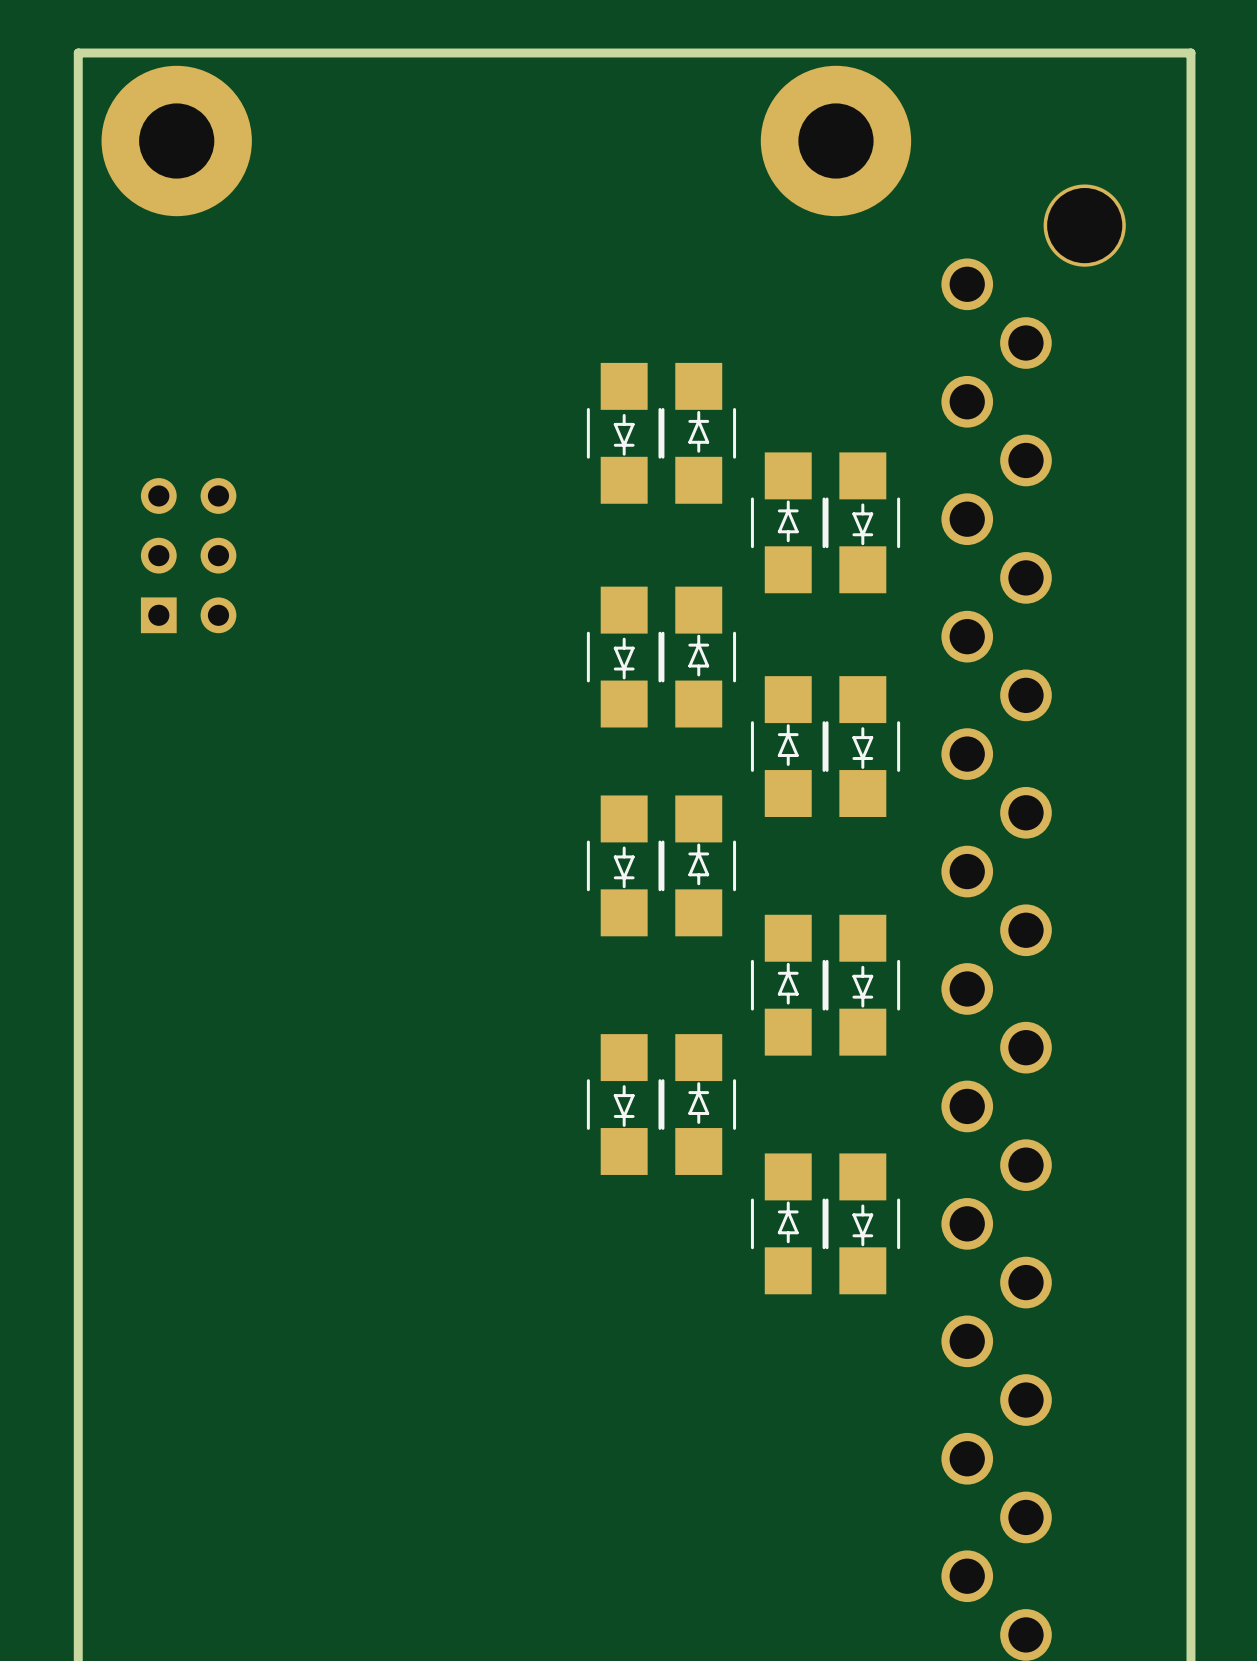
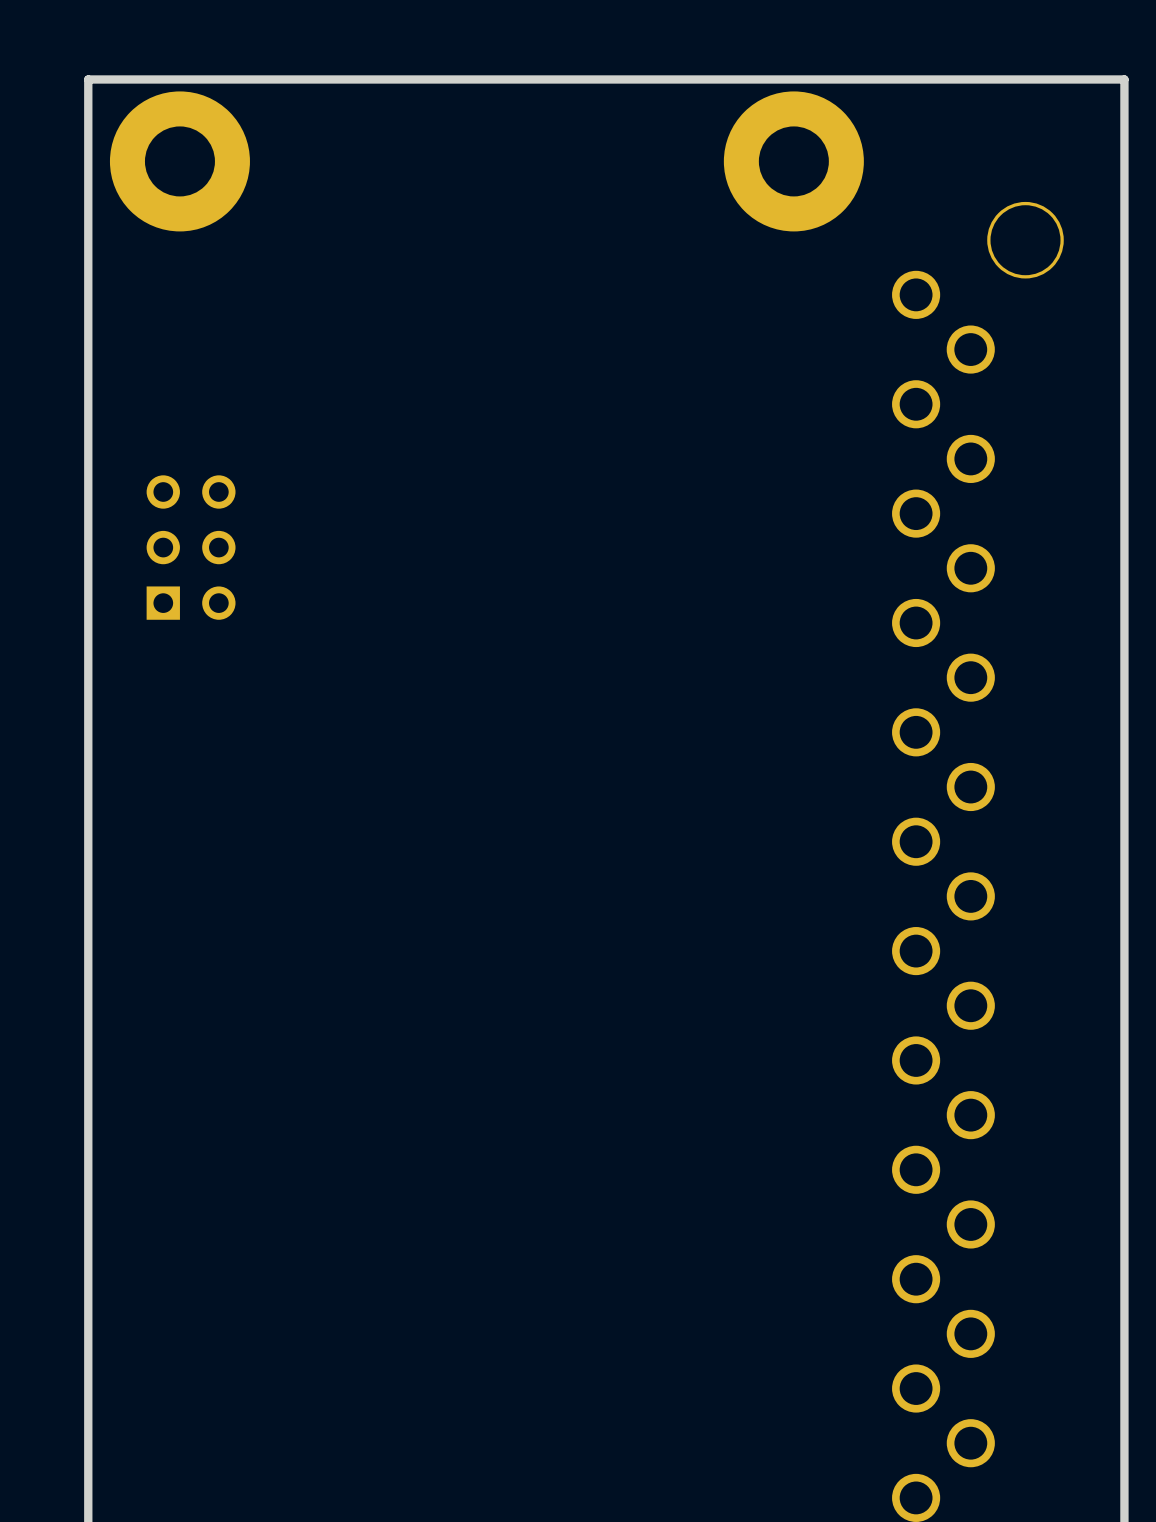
part: (624, 433) -> none
part: (698, 433) -> none
part: (788, 522) -> none
part: (862, 522) -> none
part: (624, 657) -> none
part: (698, 657) -> none
part: (788, 746) -> none
part: (862, 746) -> none
part: (624, 865) -> none
part: (698, 865) -> none
part: (788, 985) -> none
part: (862, 985) -> none
part: (624, 1104) -> none
part: (698, 1104) -> none
part: (788, 1223) -> none
part: (862, 1223) -> none

